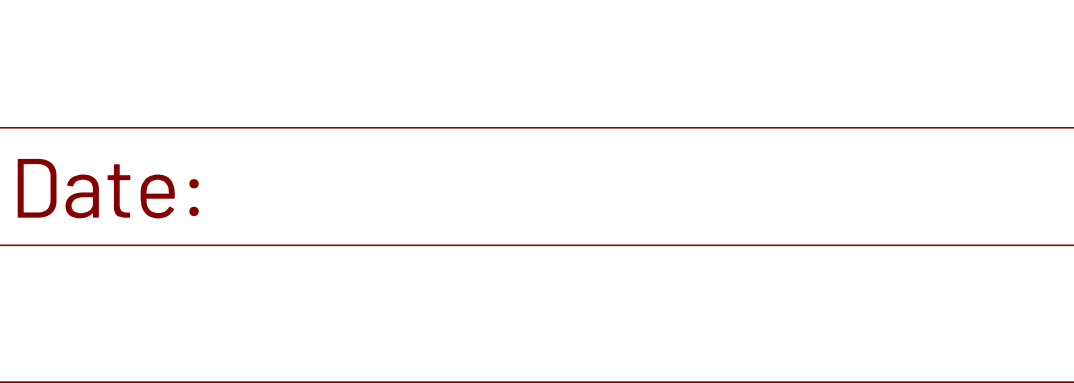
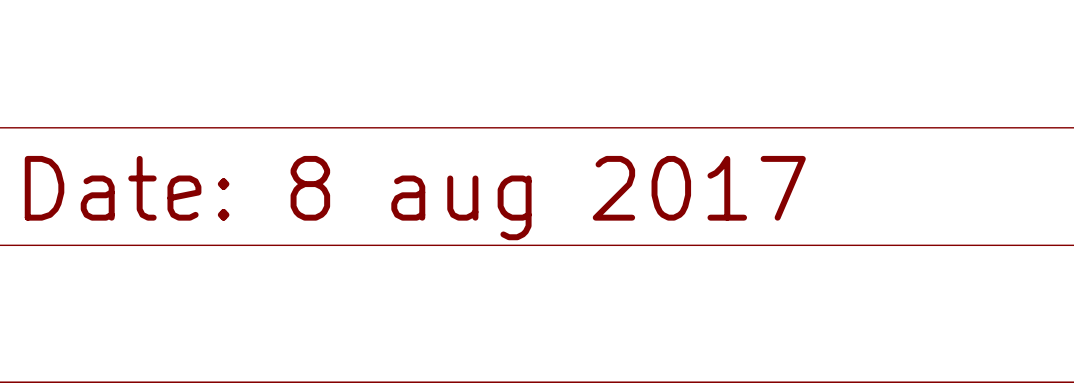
title block: Date: (108, 188) -> Date: 8 aug 2017 (415, 198)

